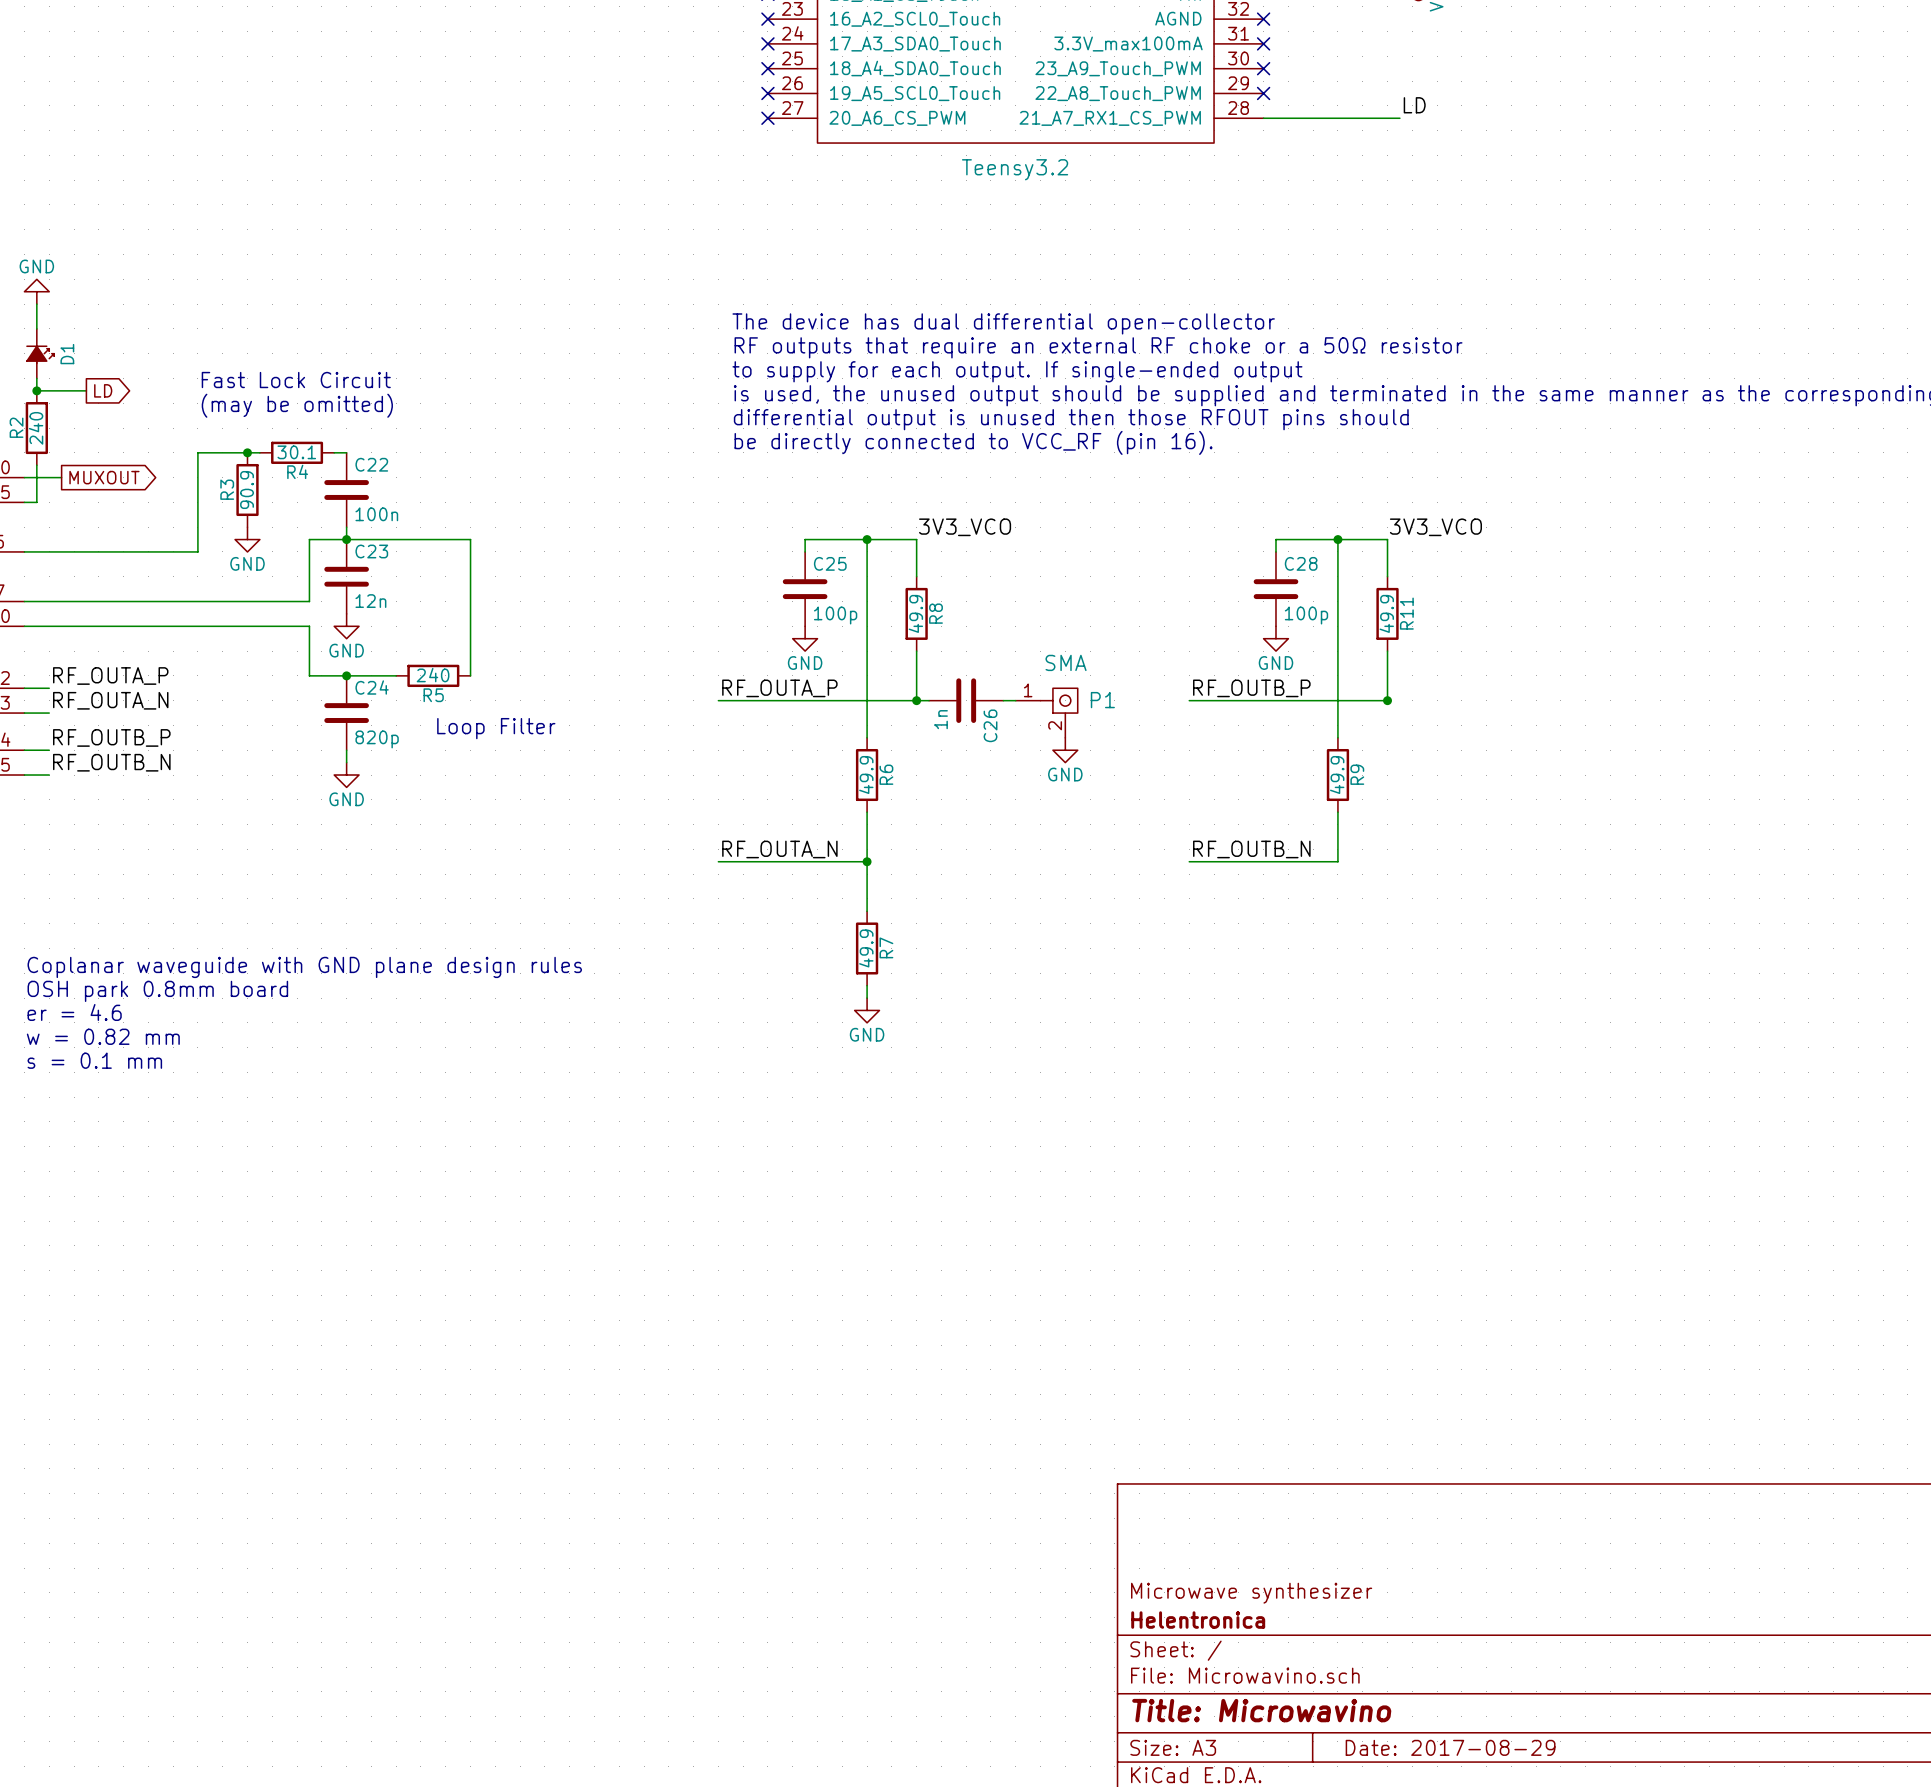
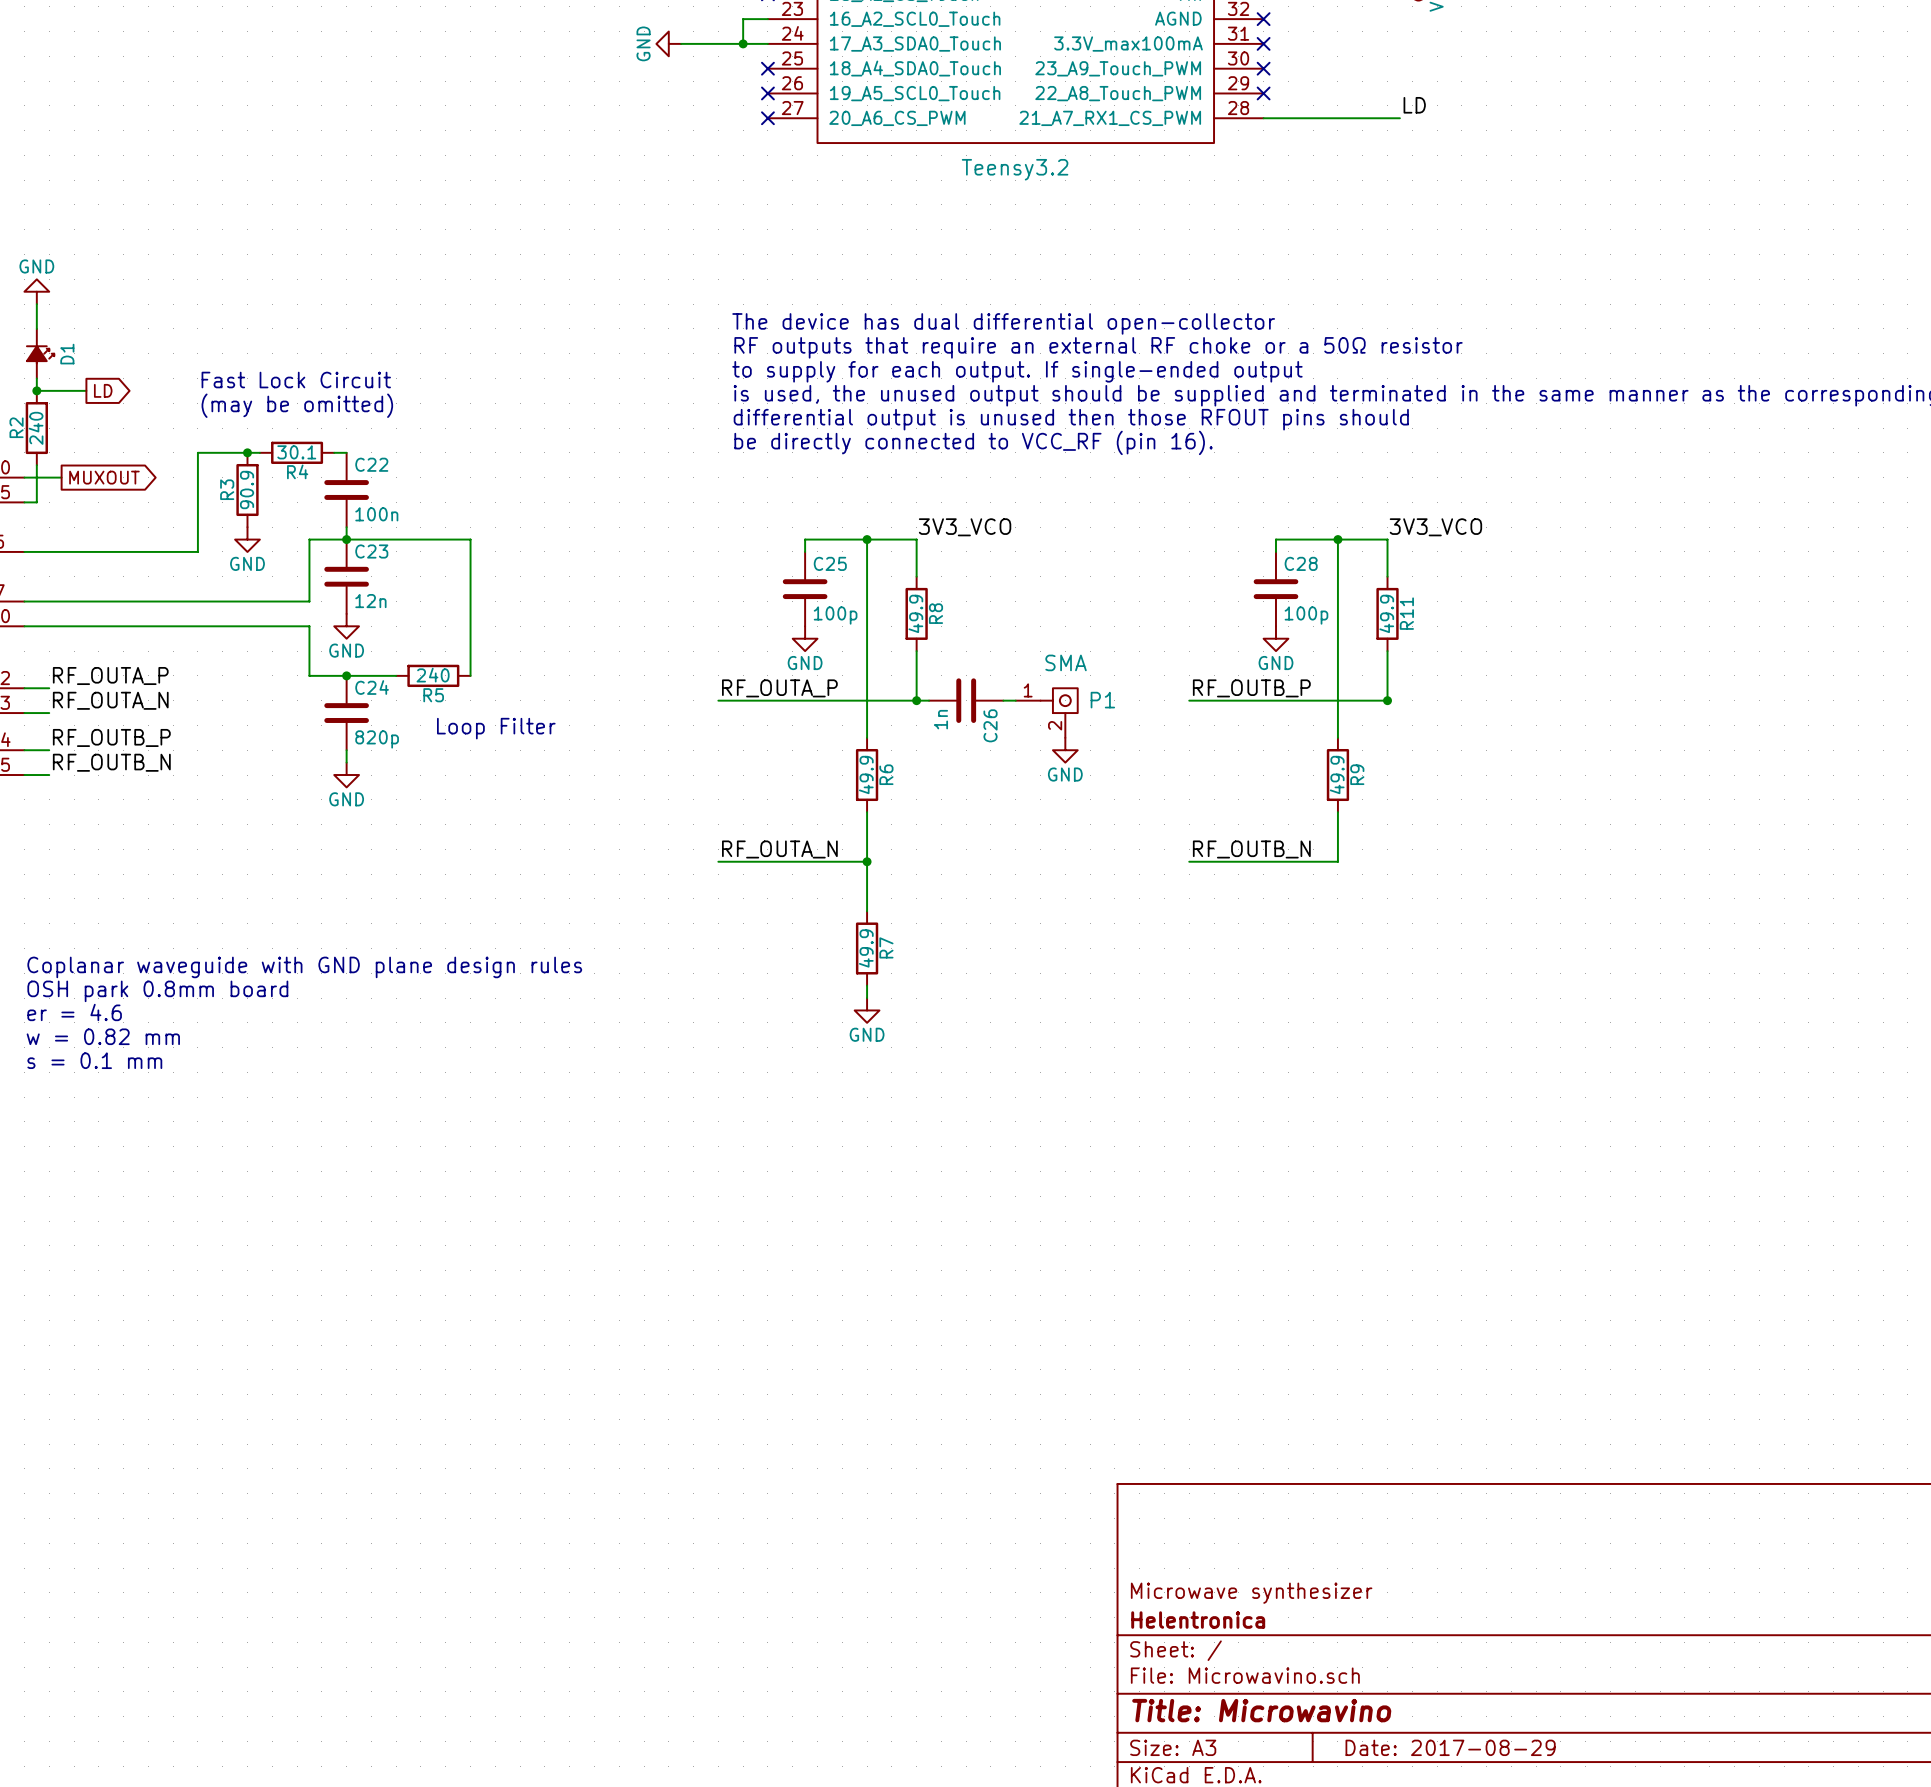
wire: none -> (767, 19) (743, 19) (743, 43)
no-connect mark: (767, 19) -> none
power symbol: none -> GND (668, 43)
wire: none -> (681, 43) (767, 43)
junction: none -> (743, 43)
no-connect mark: (767, 43) -> none

